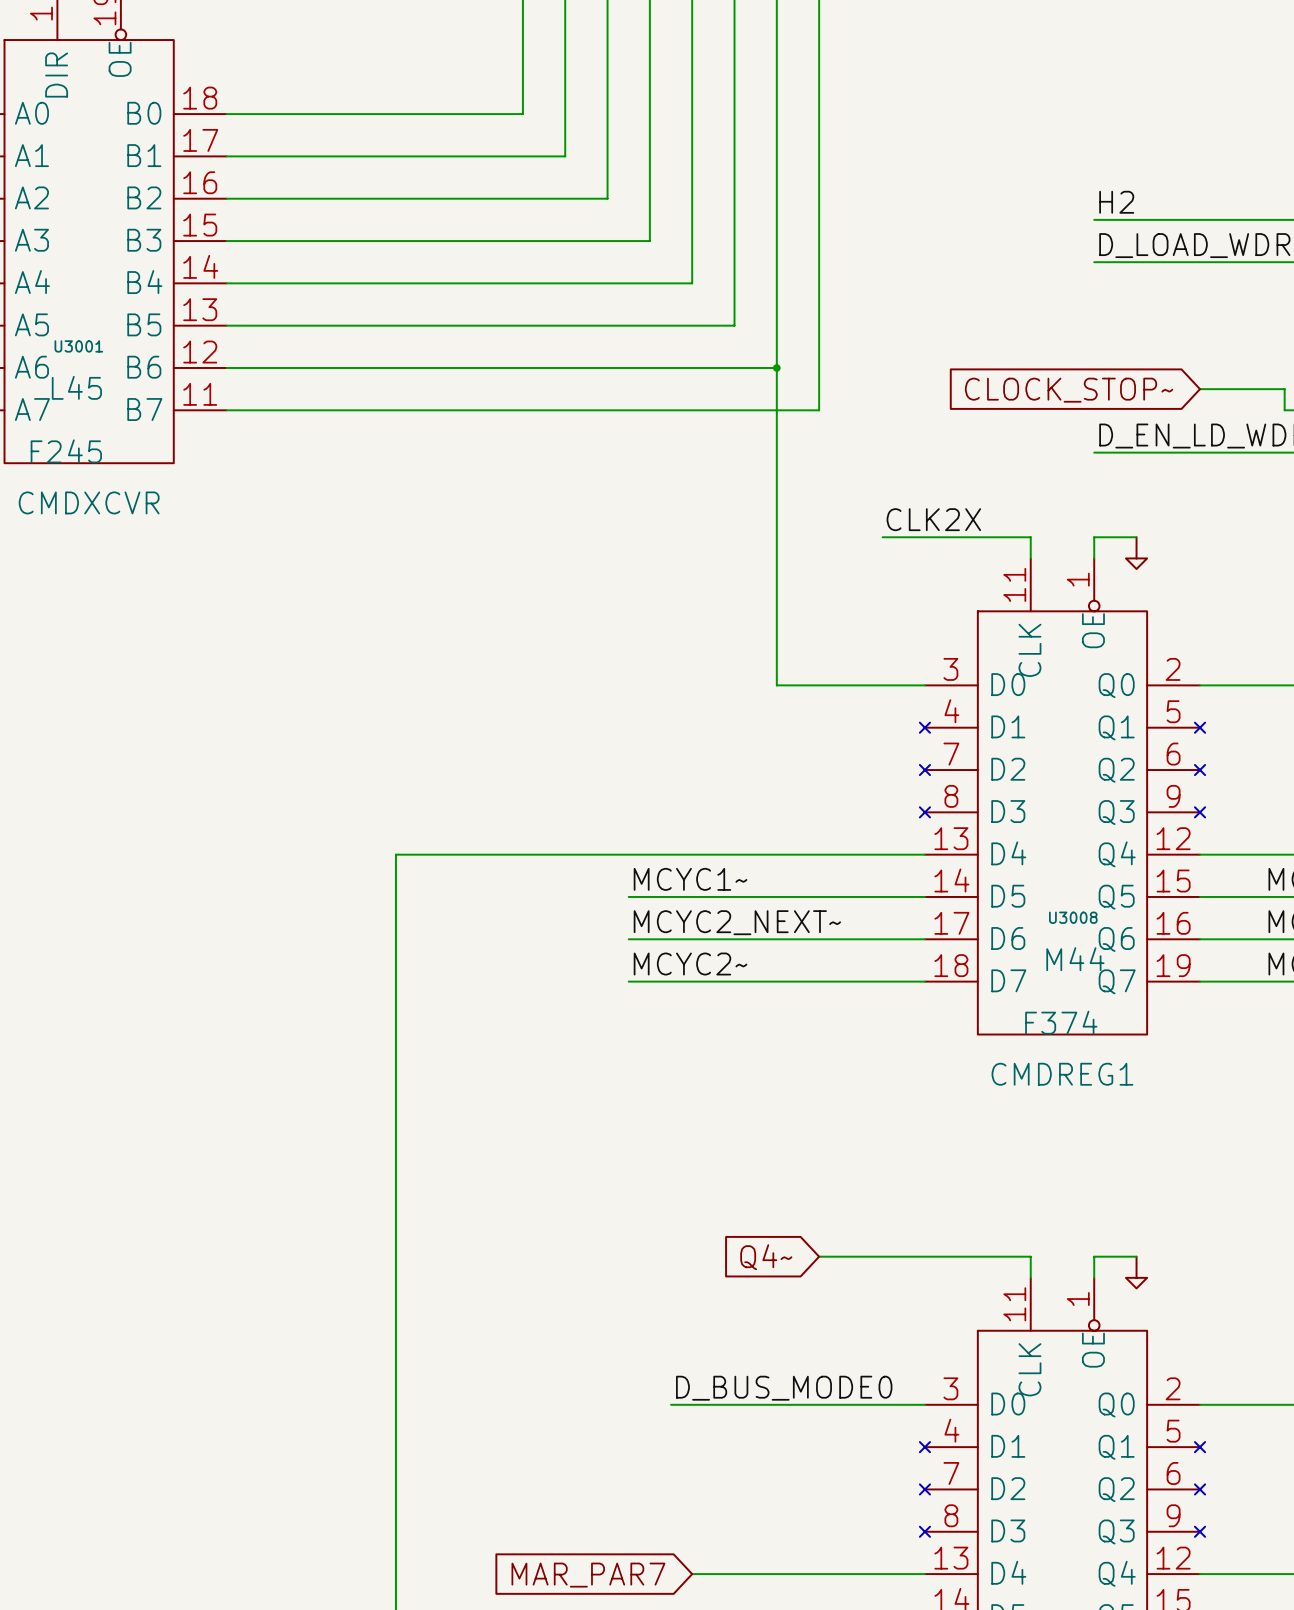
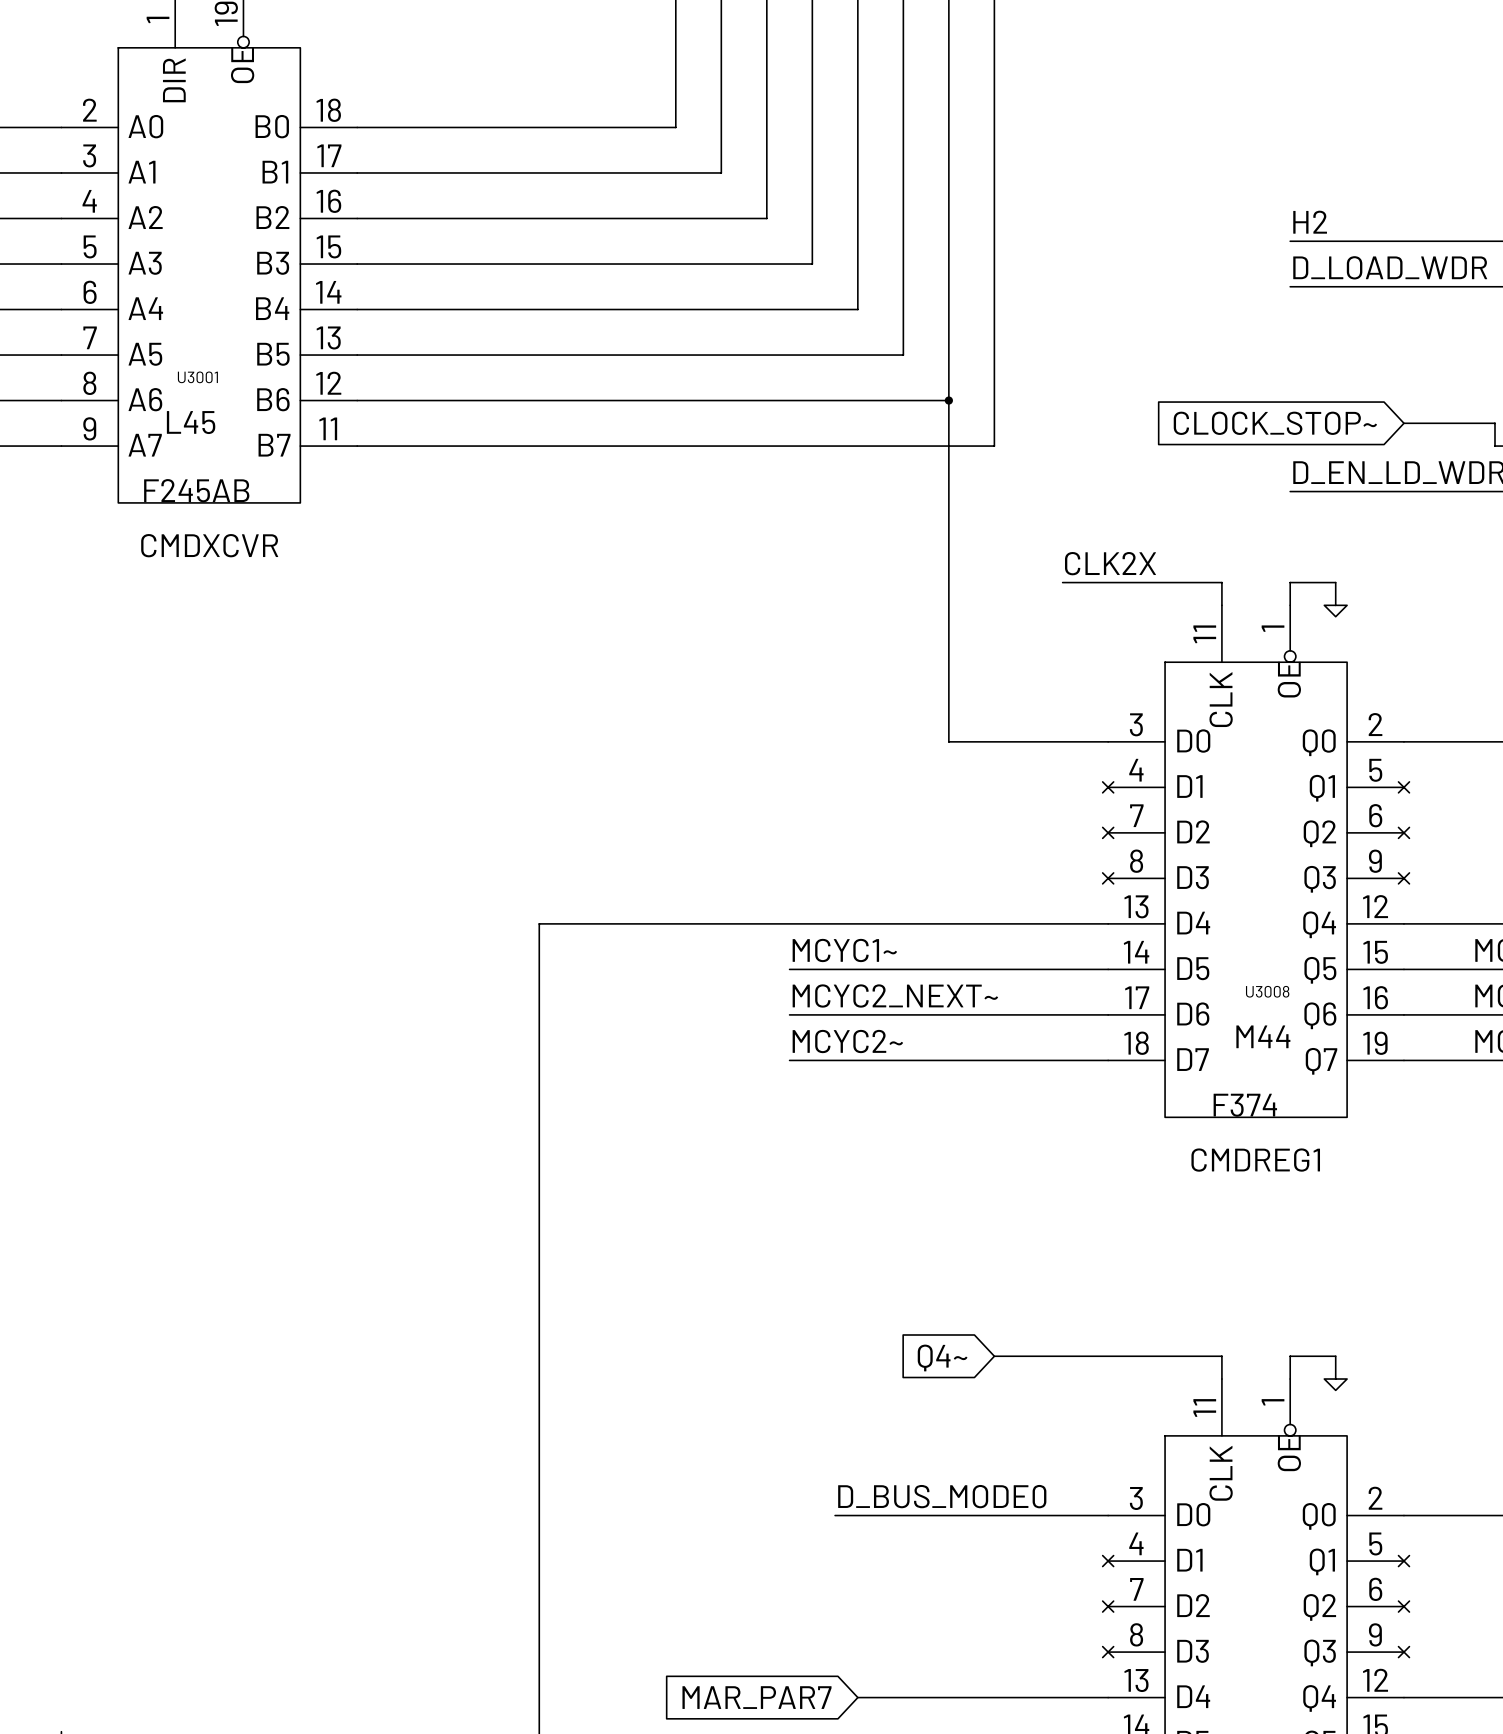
U3001 value: F245 (66, 451) -> F245AB (196, 490)

